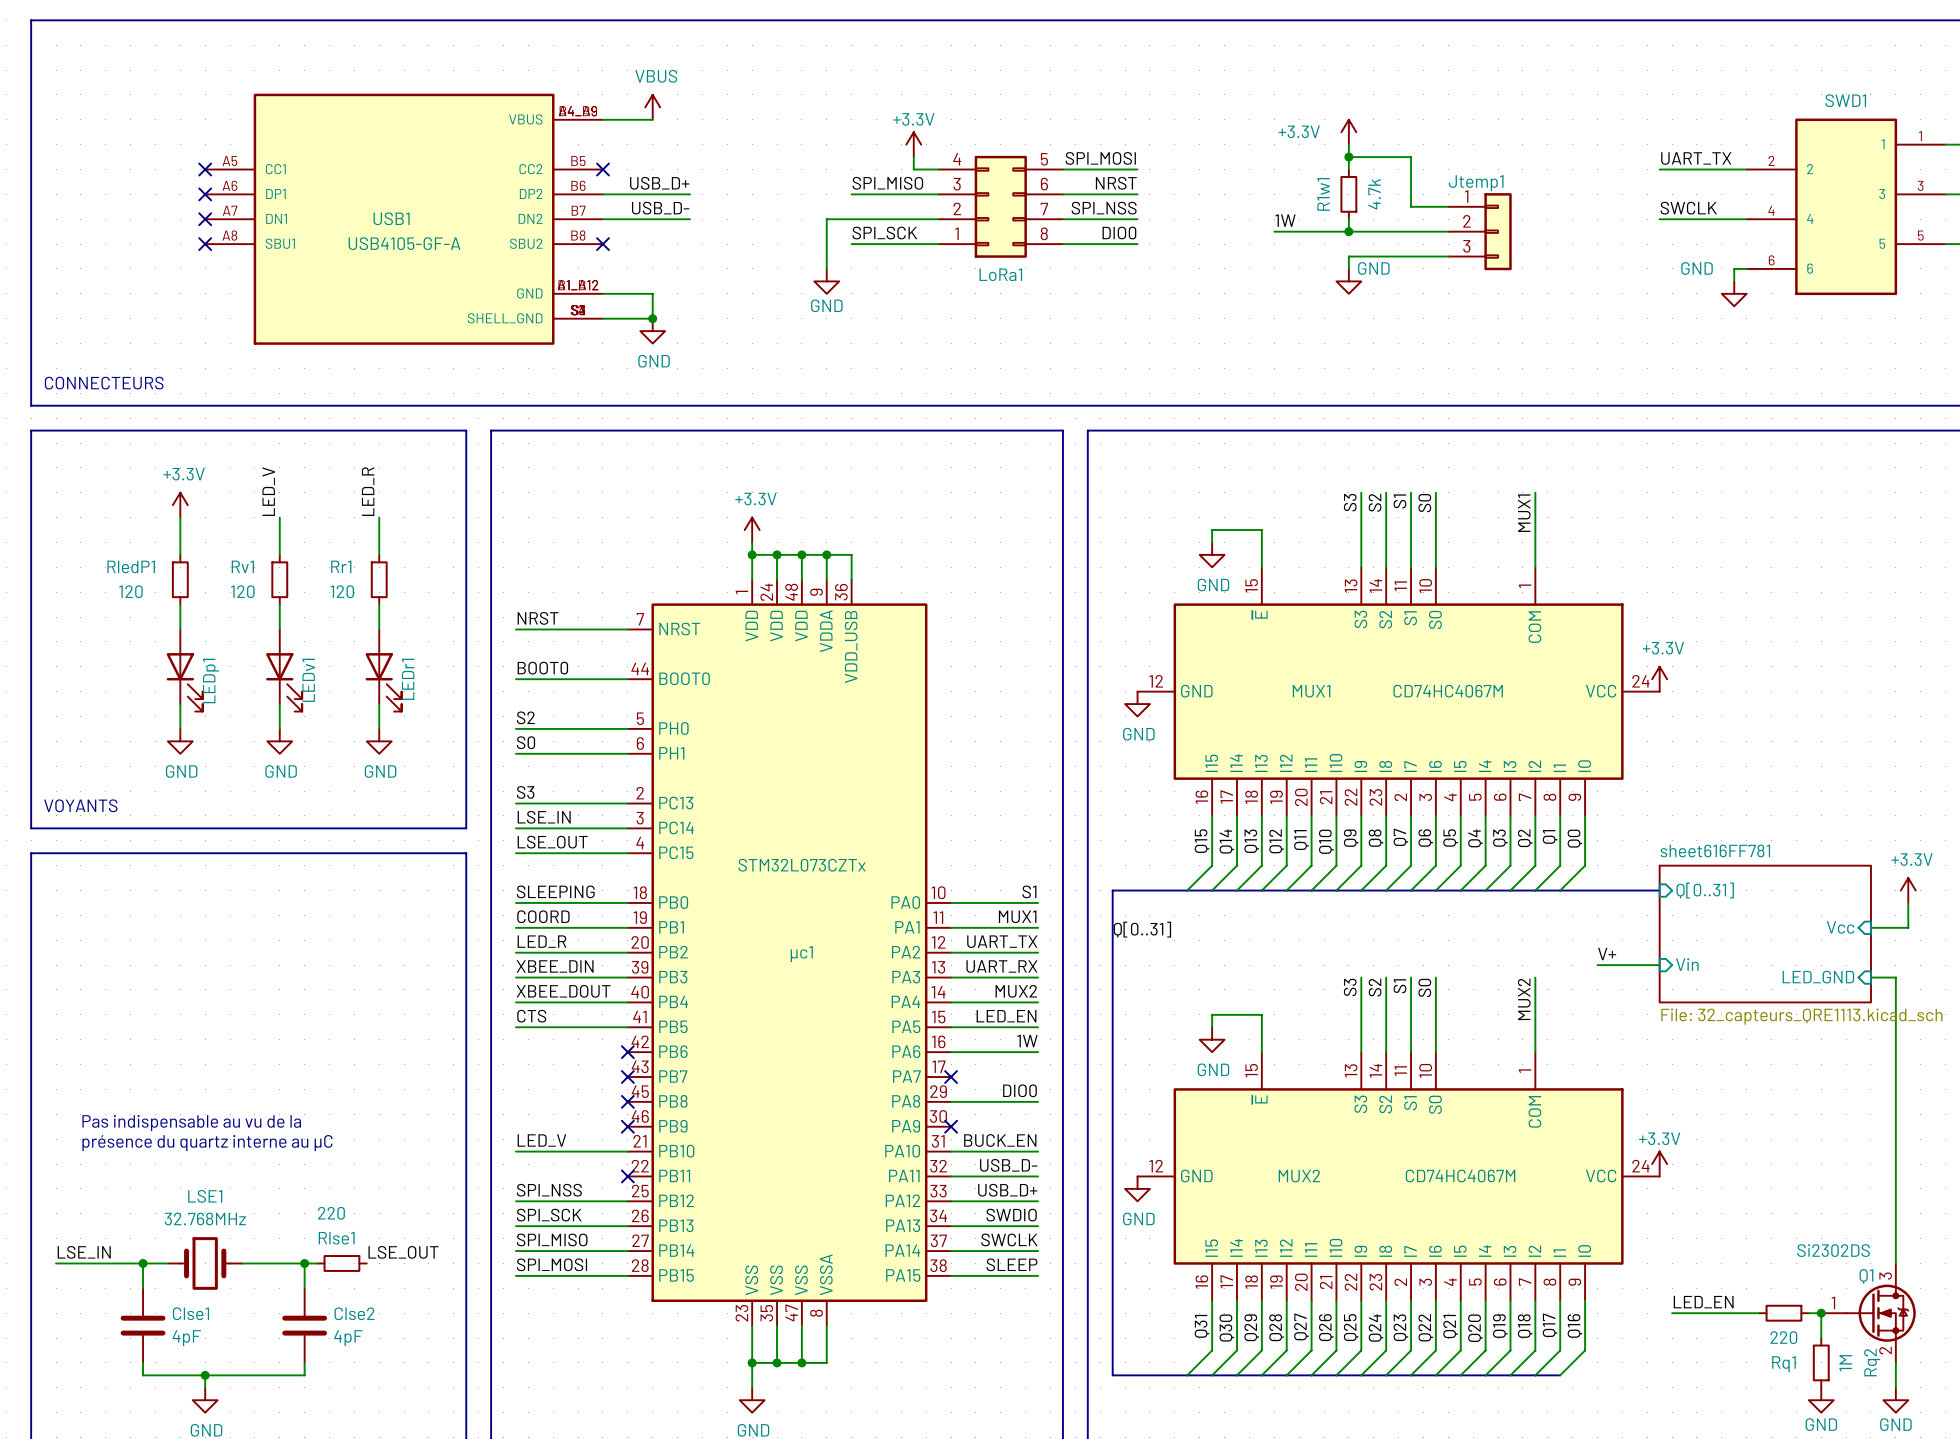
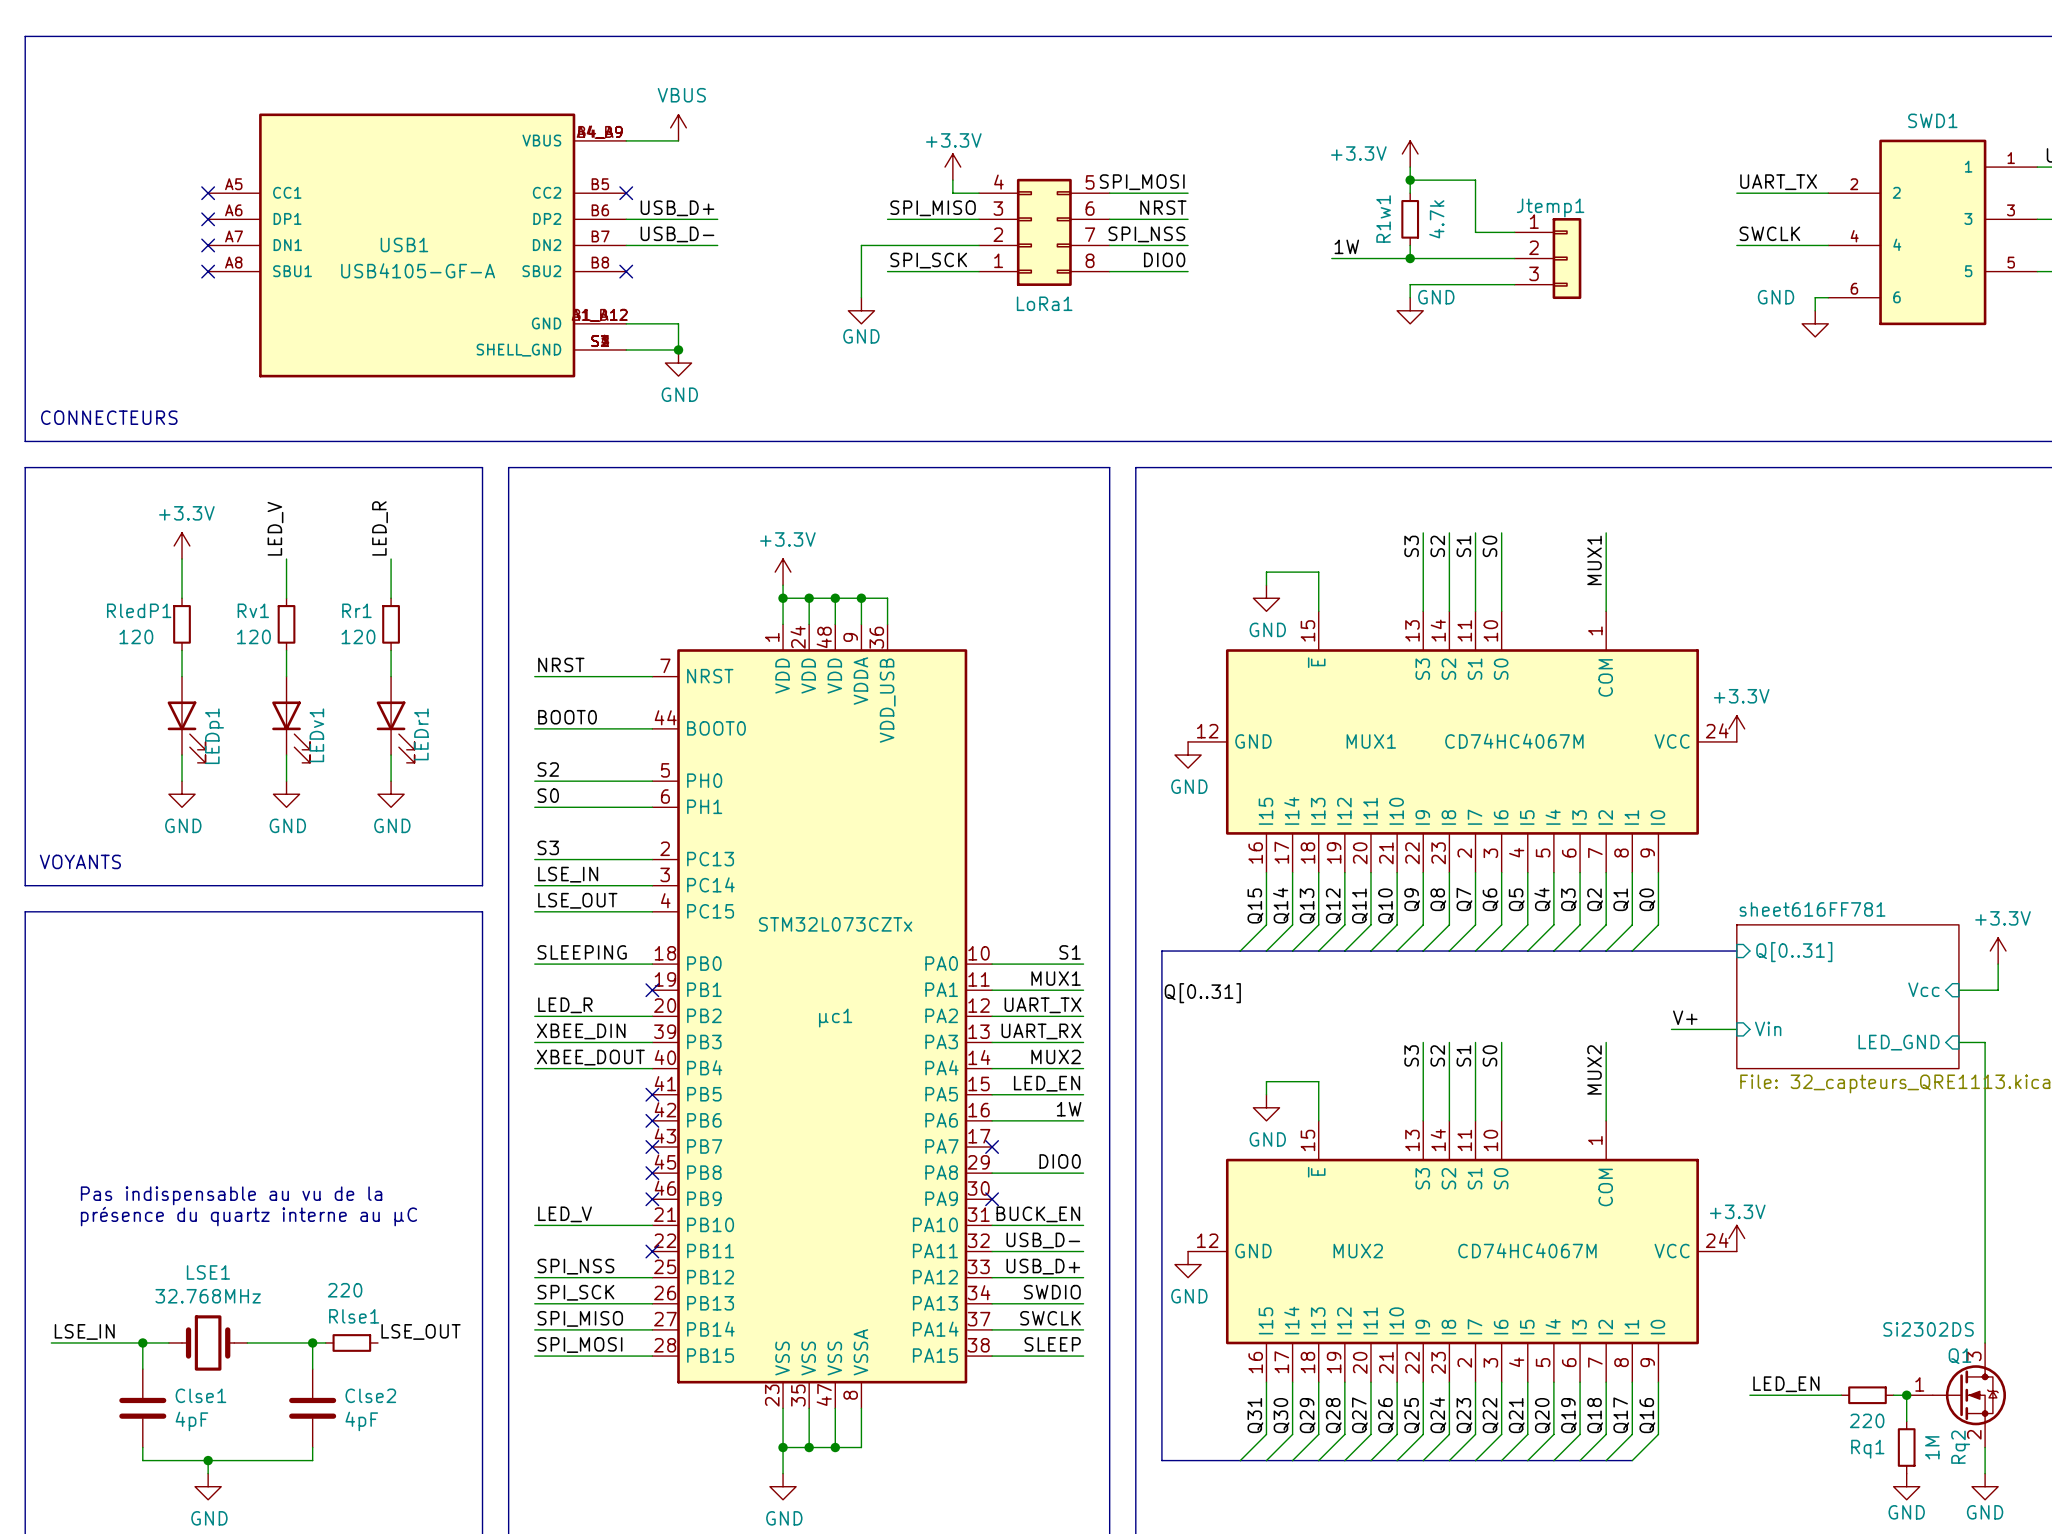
label: COORD (543, 916) -> none
wire: (515, 927) (627, 927) -> none
no-connect mark: none -> (652, 990)
label: CTS (531, 1016) -> none
wire: (515, 1027) (627, 1027) -> none
no-connect mark: none -> (652, 1094)

